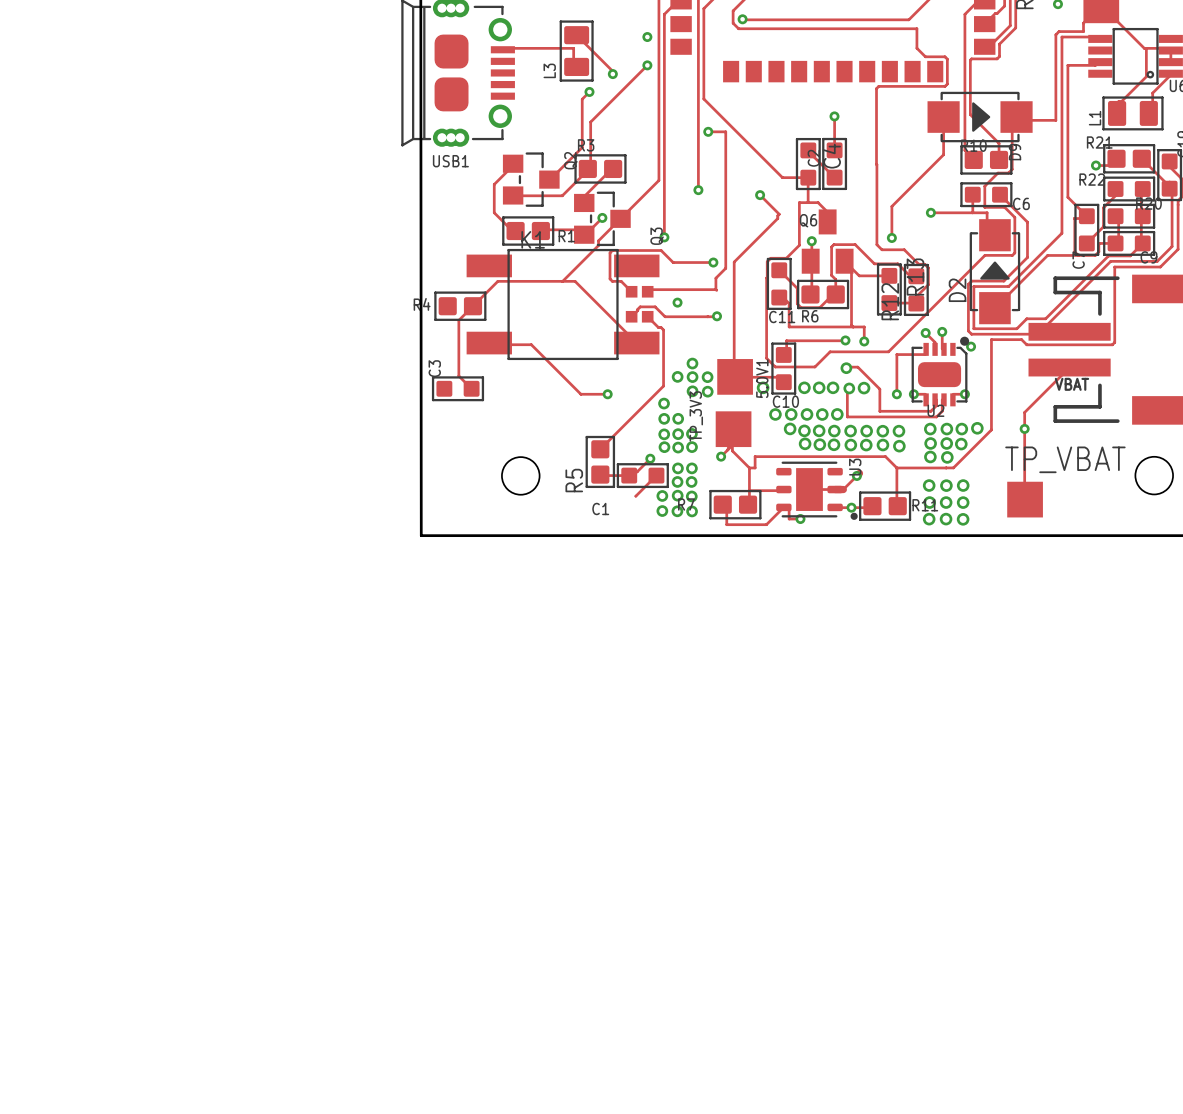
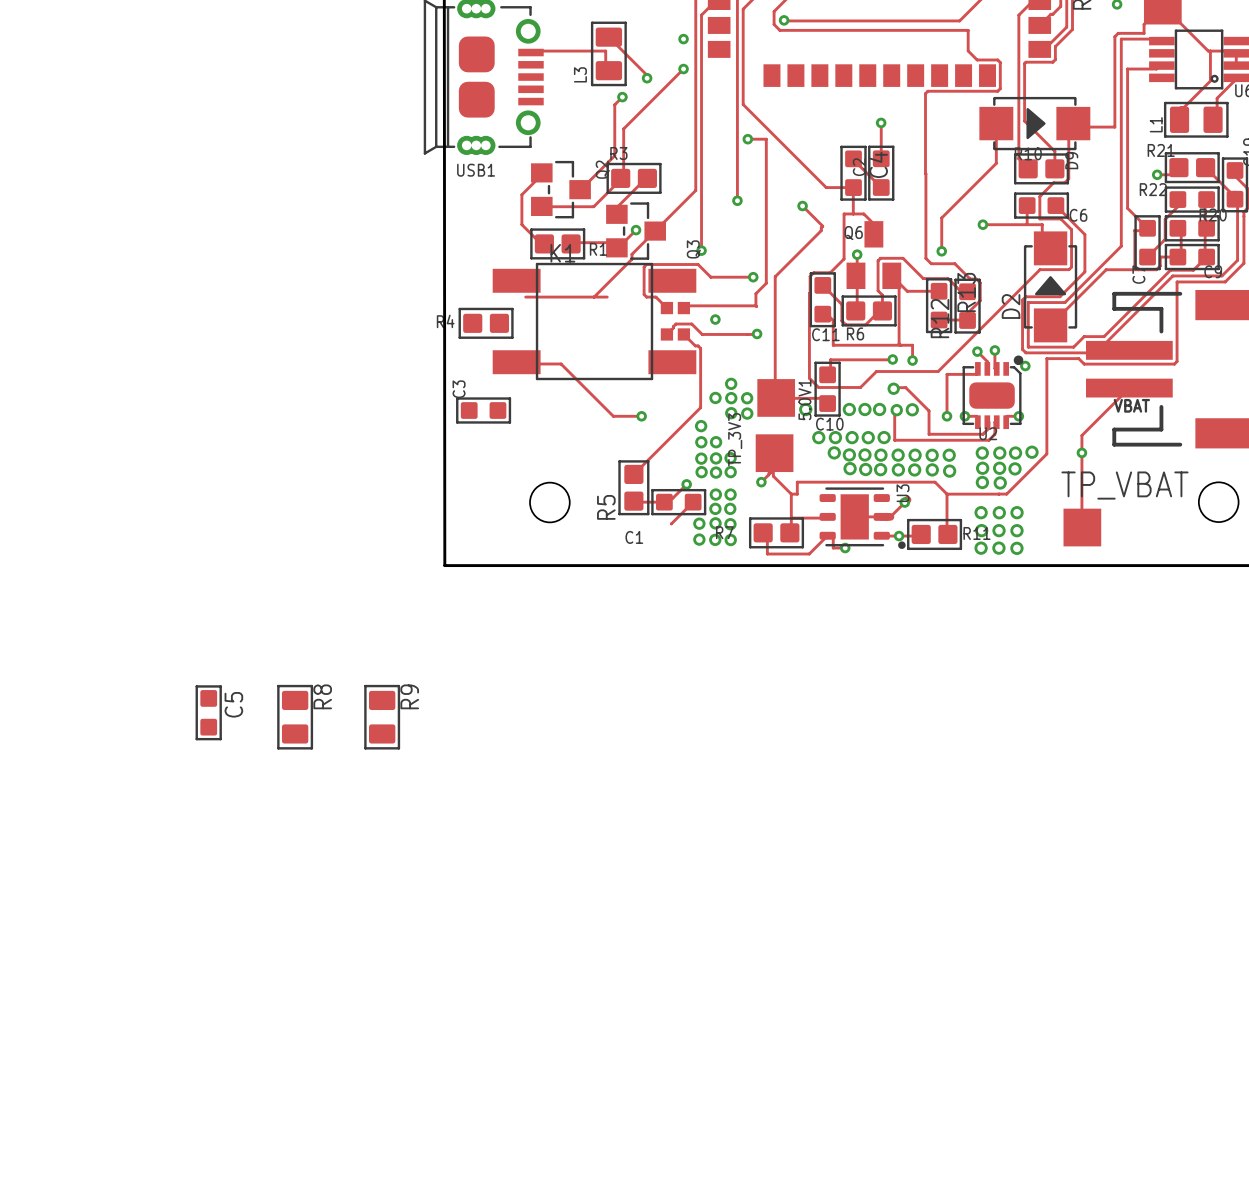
track: (497, 281) (458, 320) (458, 376) (471, 388) -> none
track: (575, 281) (636, 343) -> none
C5: none -> (208, 712)
R8: none -> (295, 717)
R9: none -> (382, 717)

